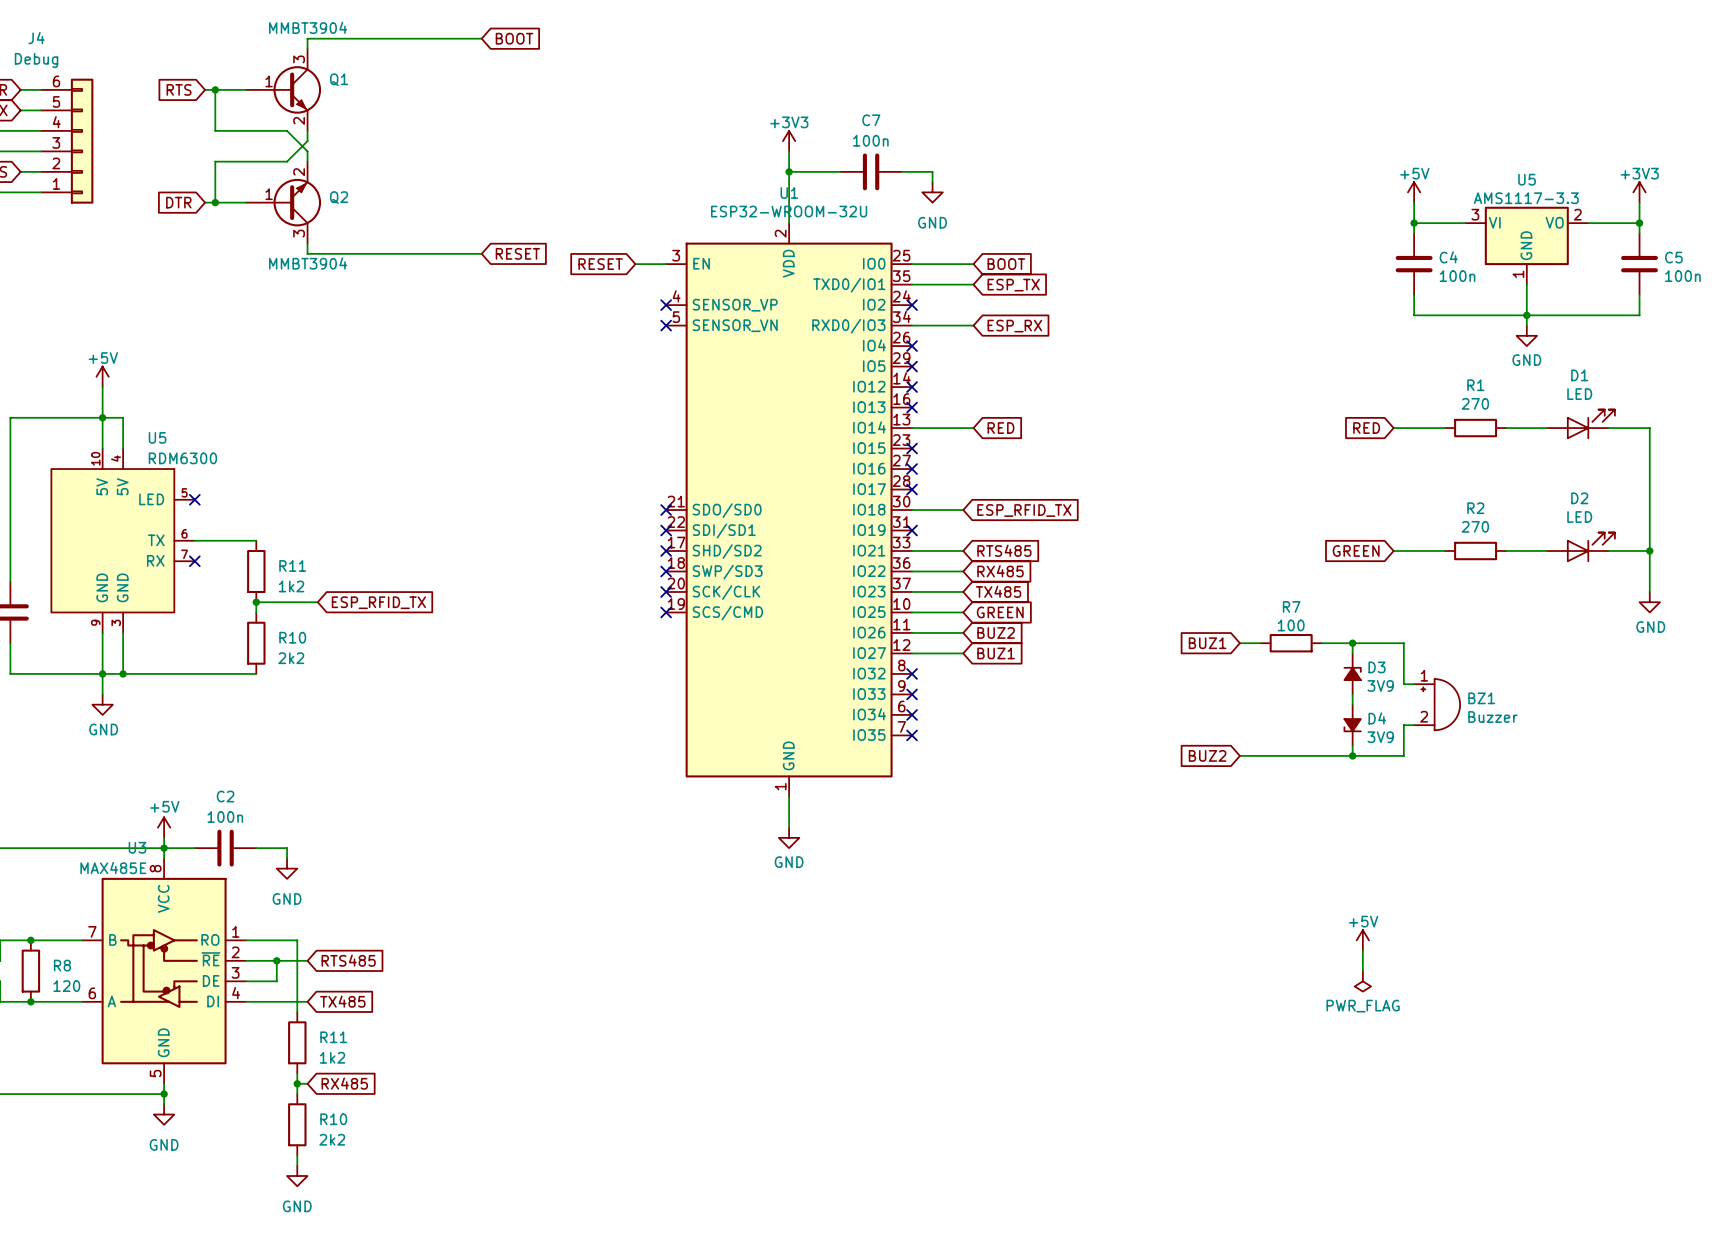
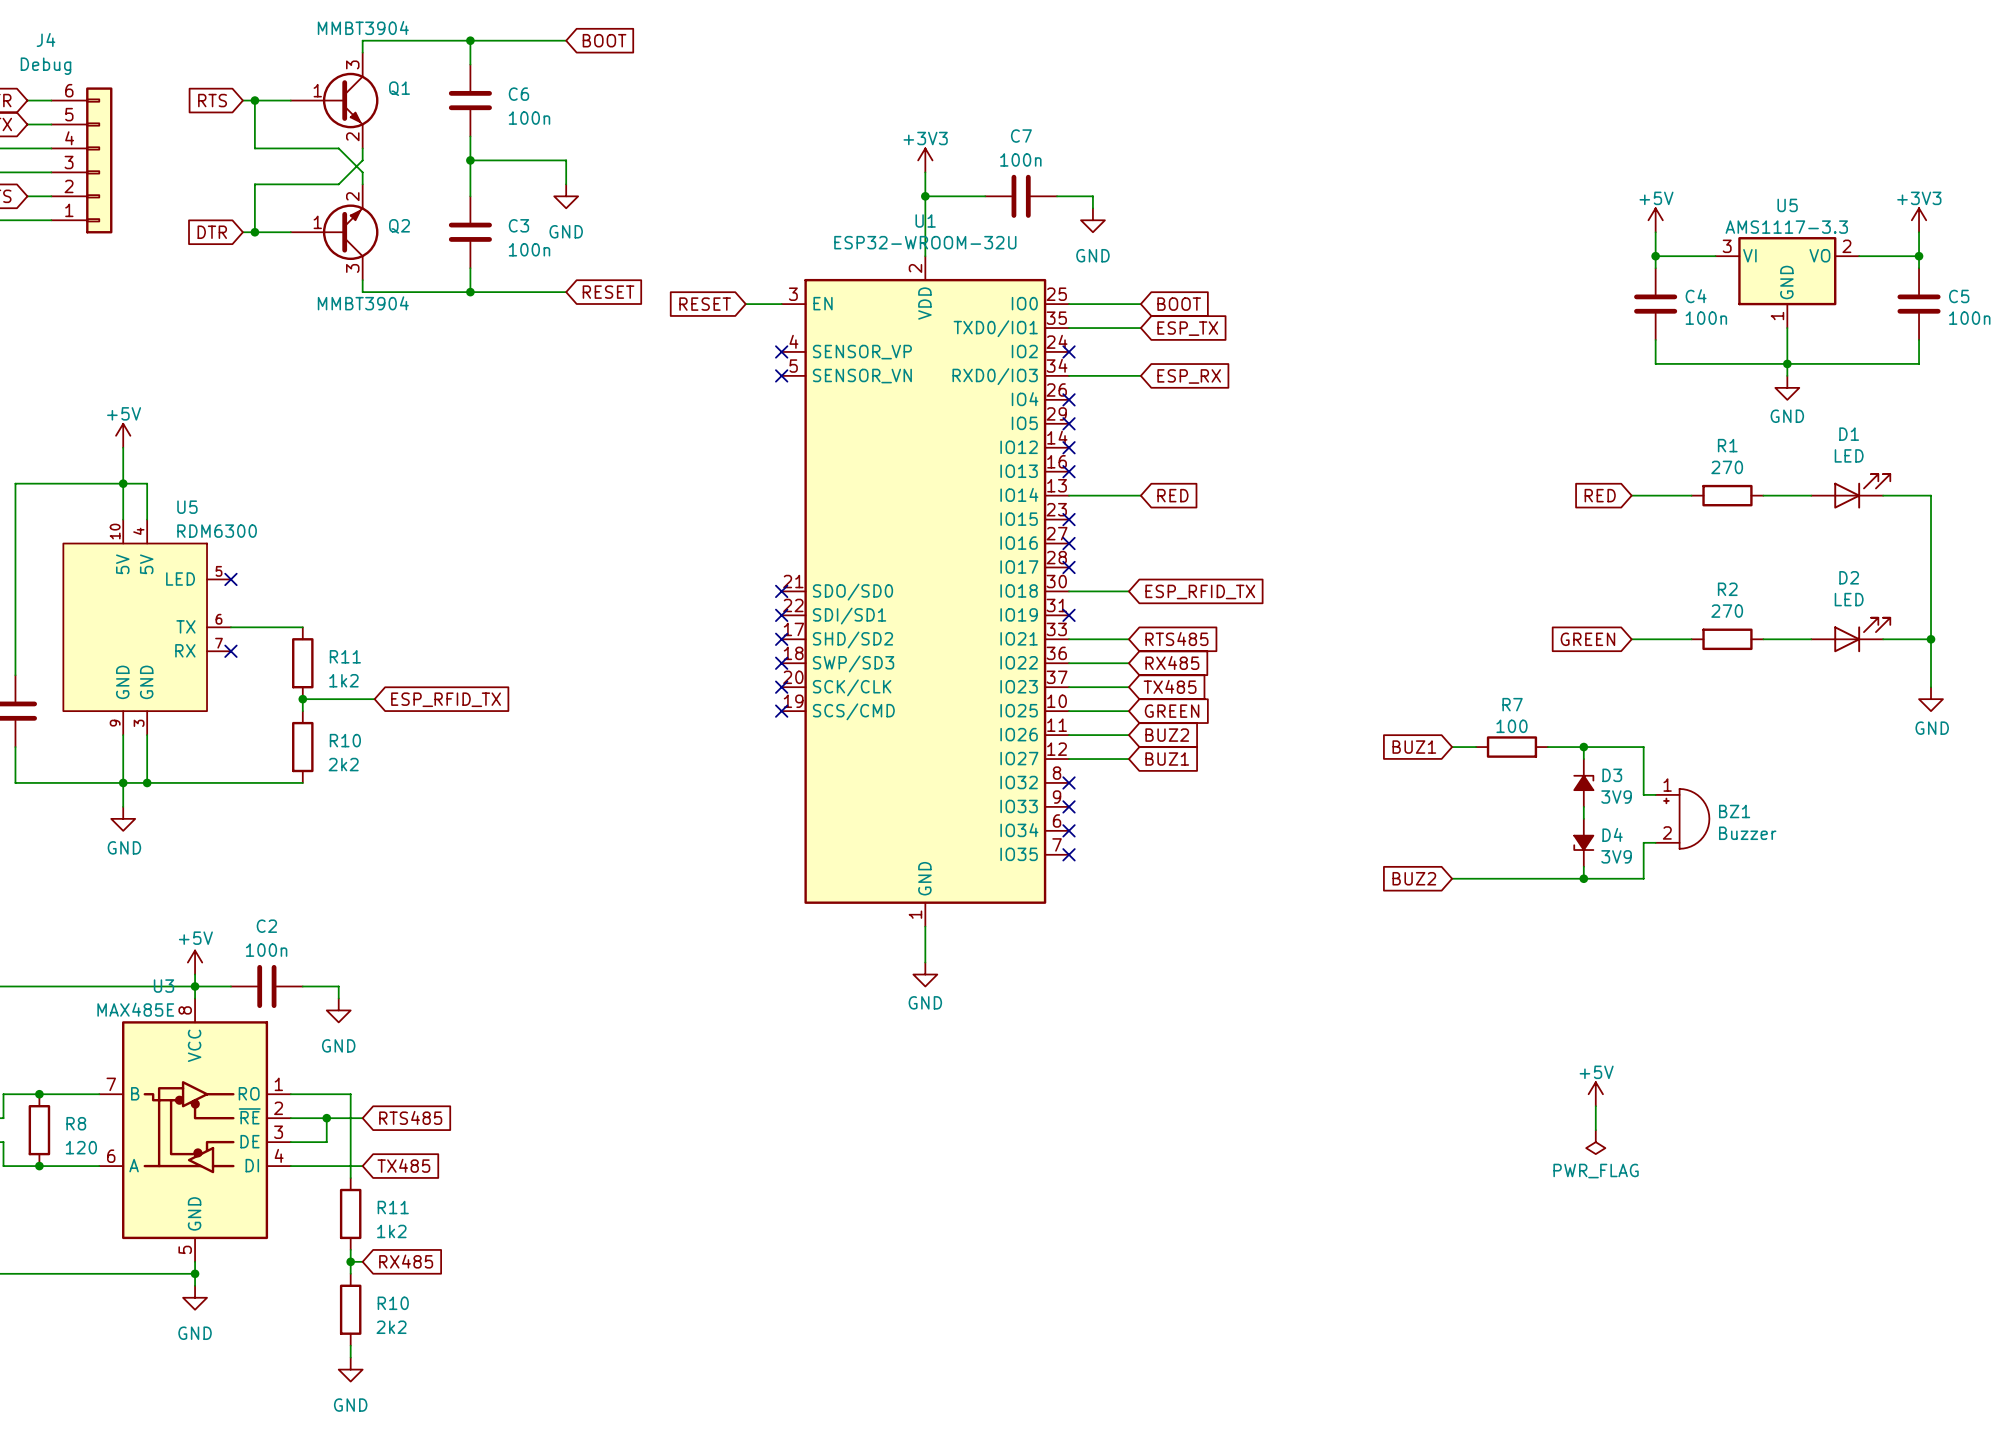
wire: none -> (470, 40) (470, 64)
junction: none -> (470, 40)
C6: none -> 100n (470, 100)
wire: none -> (470, 136) (470, 196)
wire: none -> (470, 160) (566, 160) (566, 184)
junction: none -> (470, 160)
power symbol: none -> GND (566, 196)
C3: none -> 100n (470, 232)
wire: none -> (470, 268) (470, 292)
junction: none -> (470, 292)

